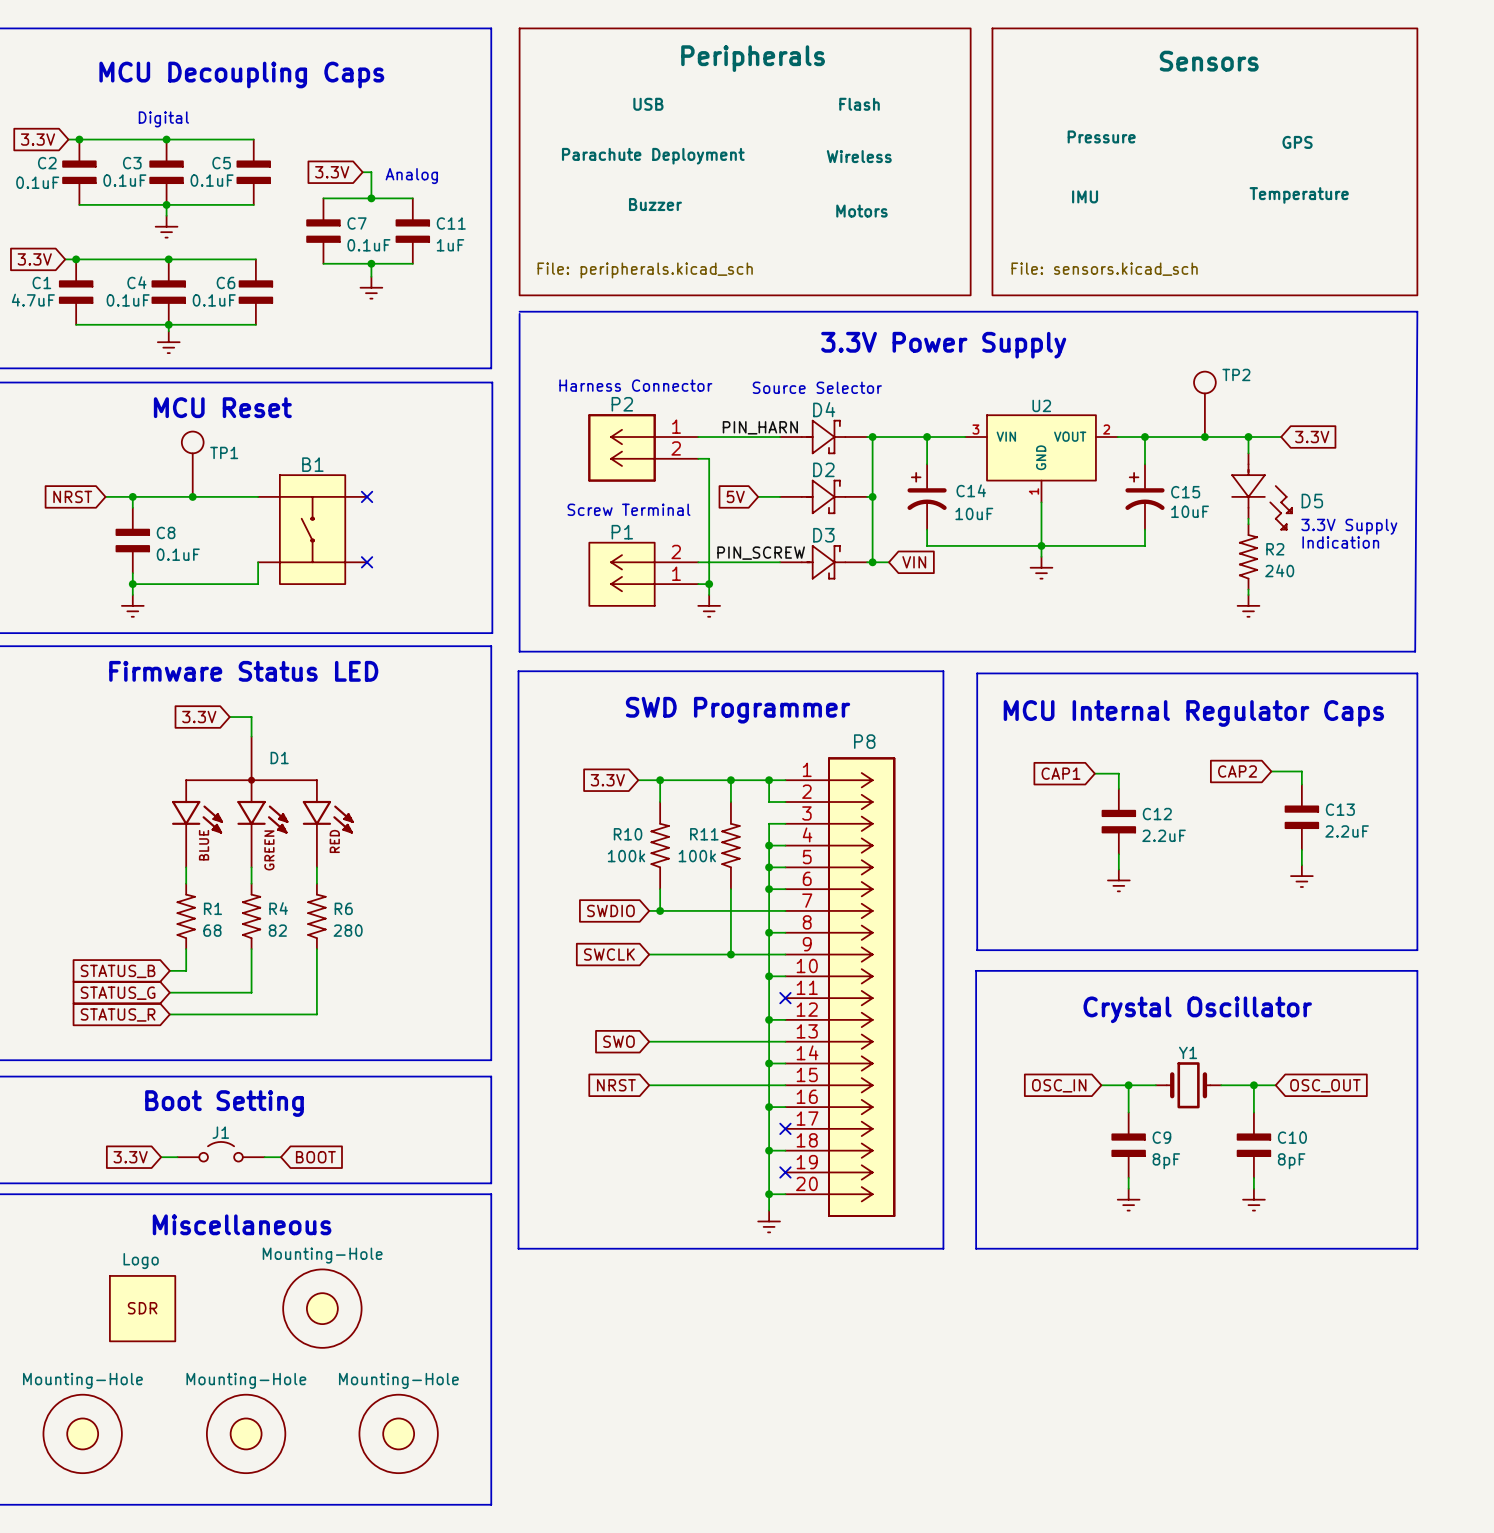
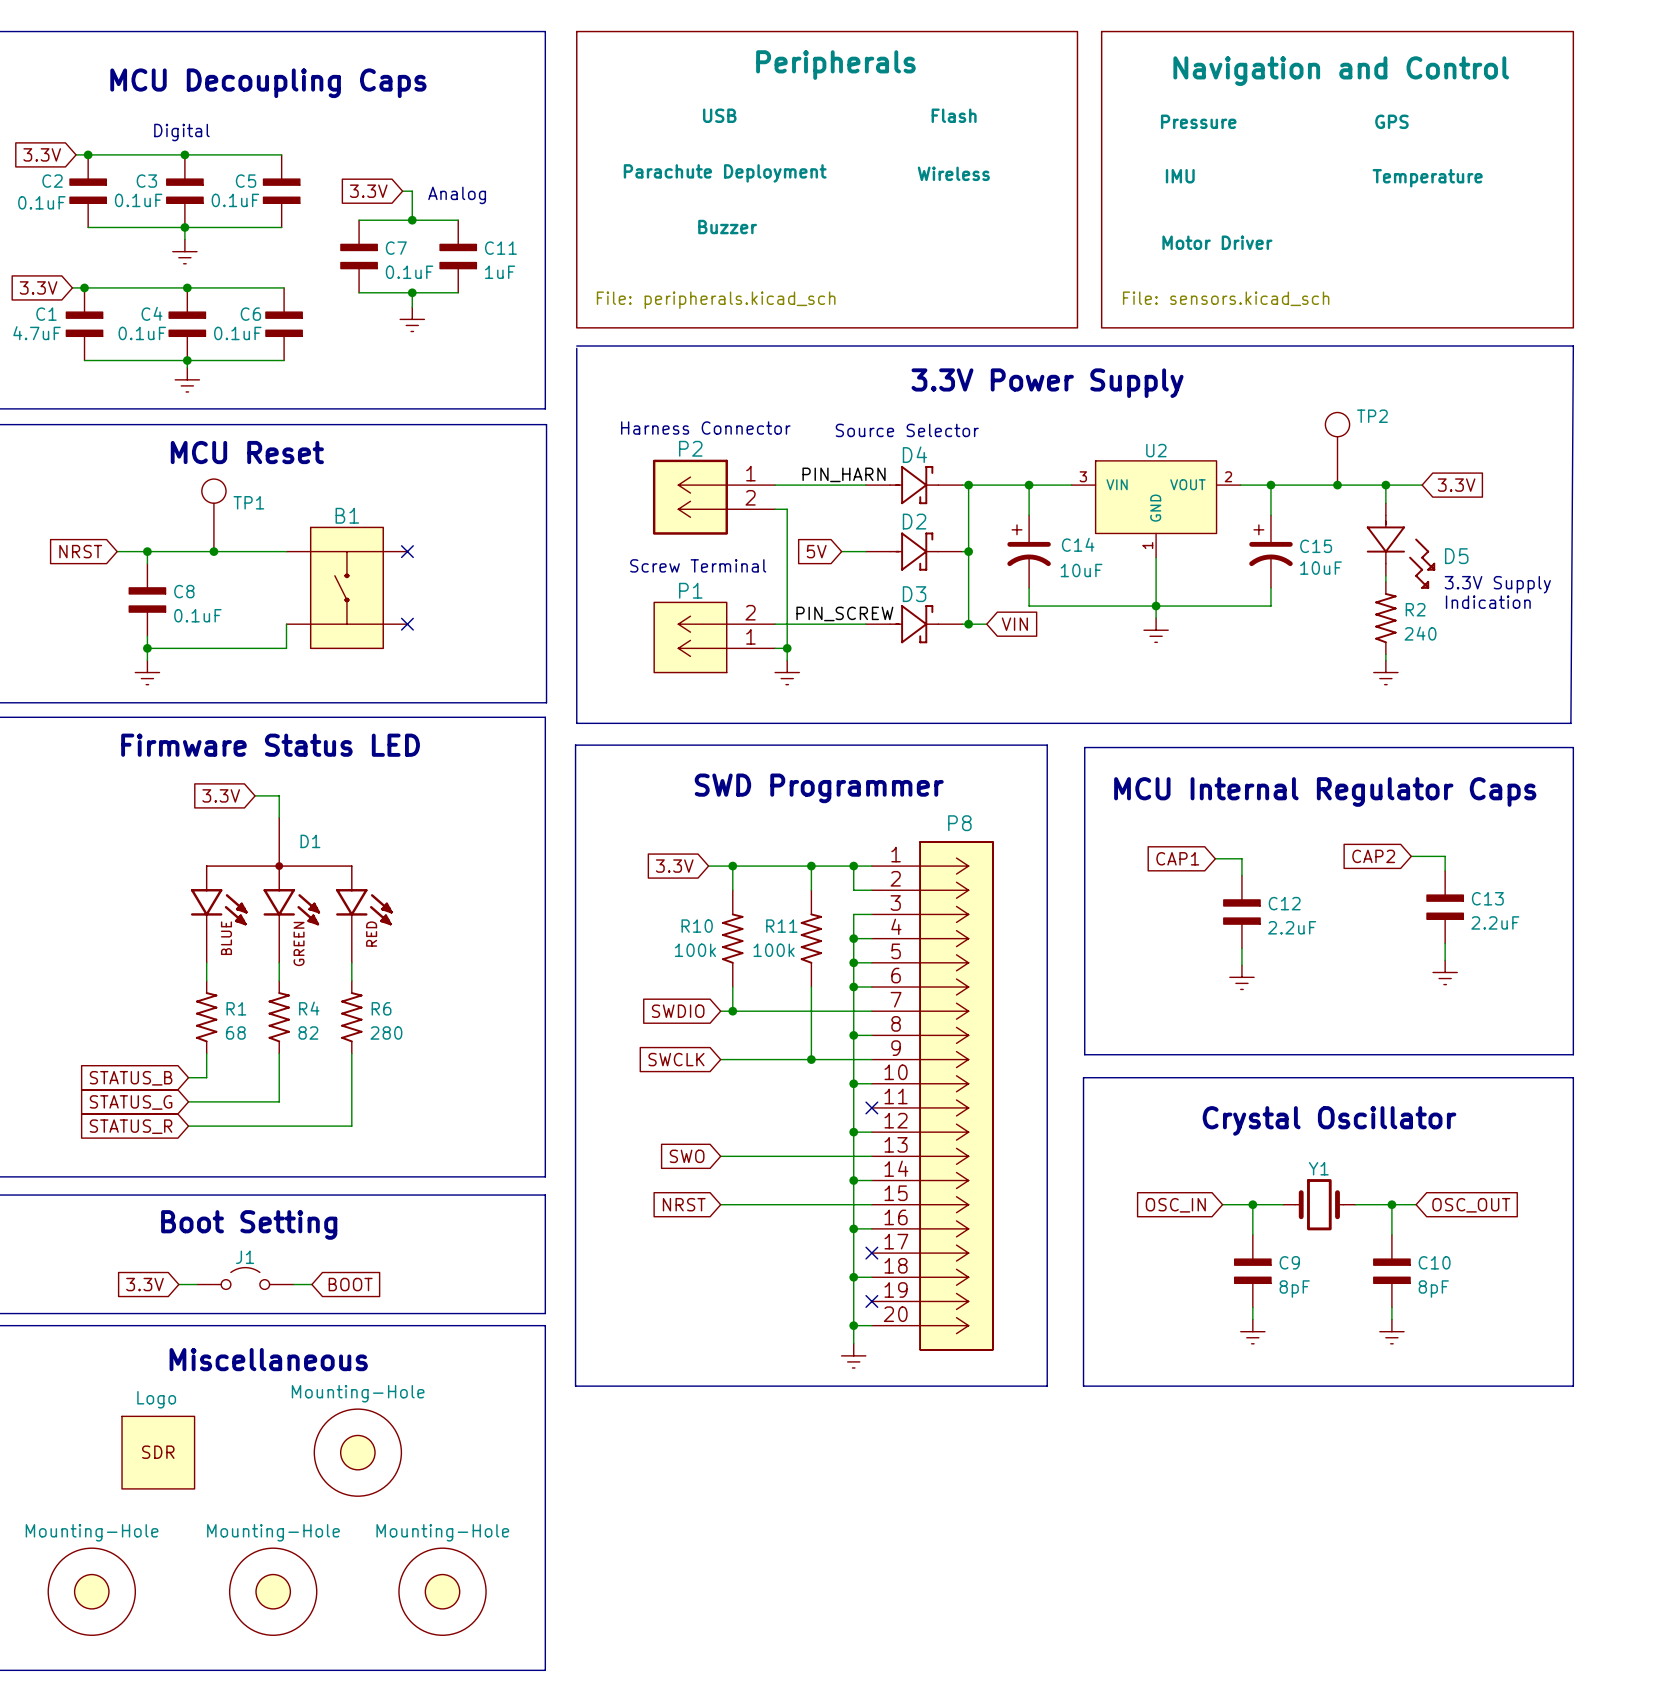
sheet Sensors name: Sensors (1209, 61) -> Navigation and Control (1341, 71)
sheet Sensors text position: Pressure (1101, 136) -> Pressure (1198, 121)
sheet Sensors text position: GPS (1297, 142) -> GPS (1391, 121)
sheet Sensors text position: Temperature (1299, 195) -> Temperature (1427, 178)
sheet Sensors text position: IMU (1085, 196) -> IMU (1180, 176)
sheet Peripherals text: Motors (861, 211) -> none
sheet Sensors text: none -> Motor Driver (1217, 242)

